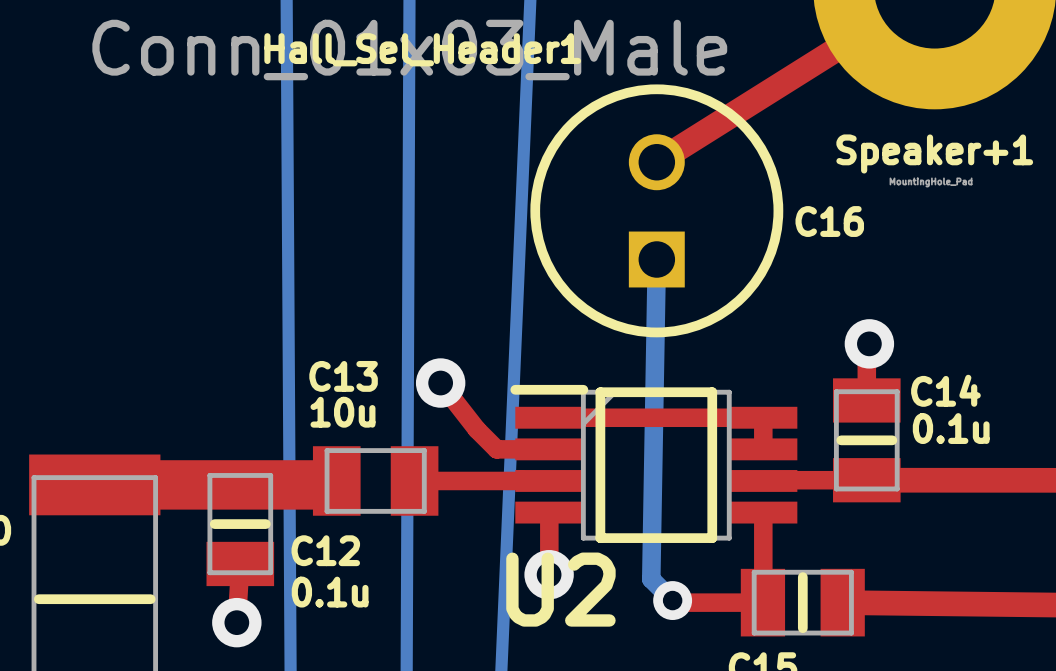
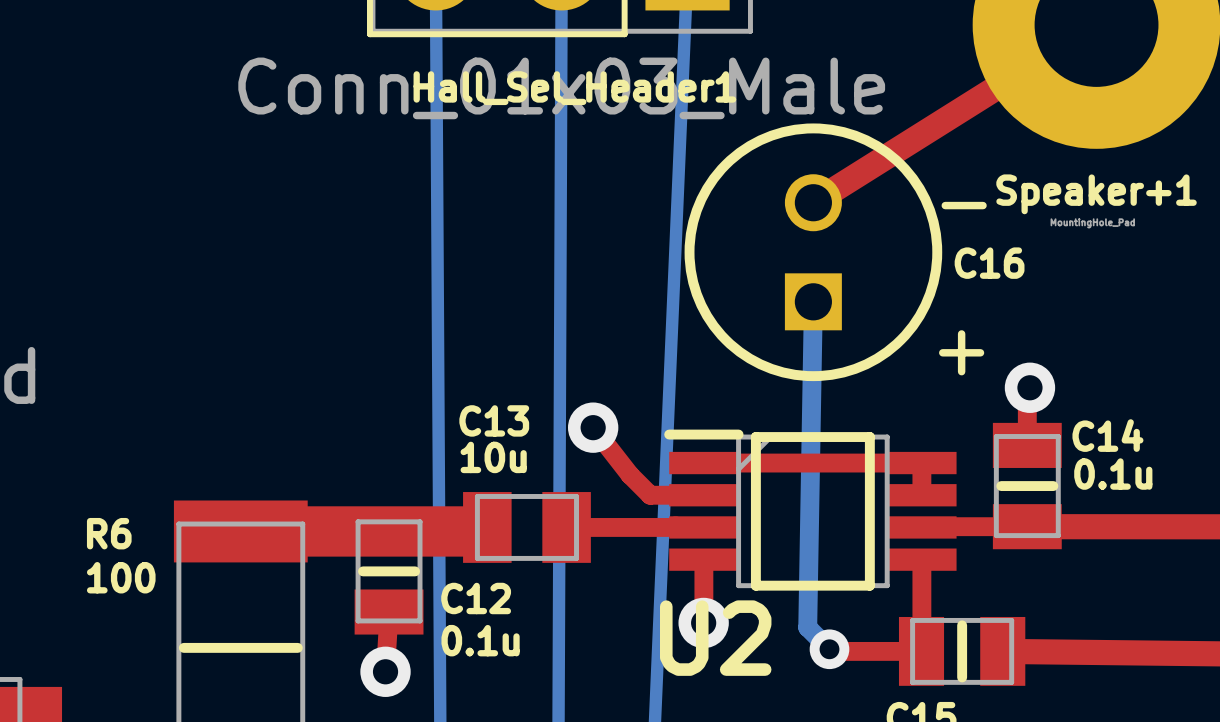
text: none -> - (964, 205)
text: none -> + (961, 352)

